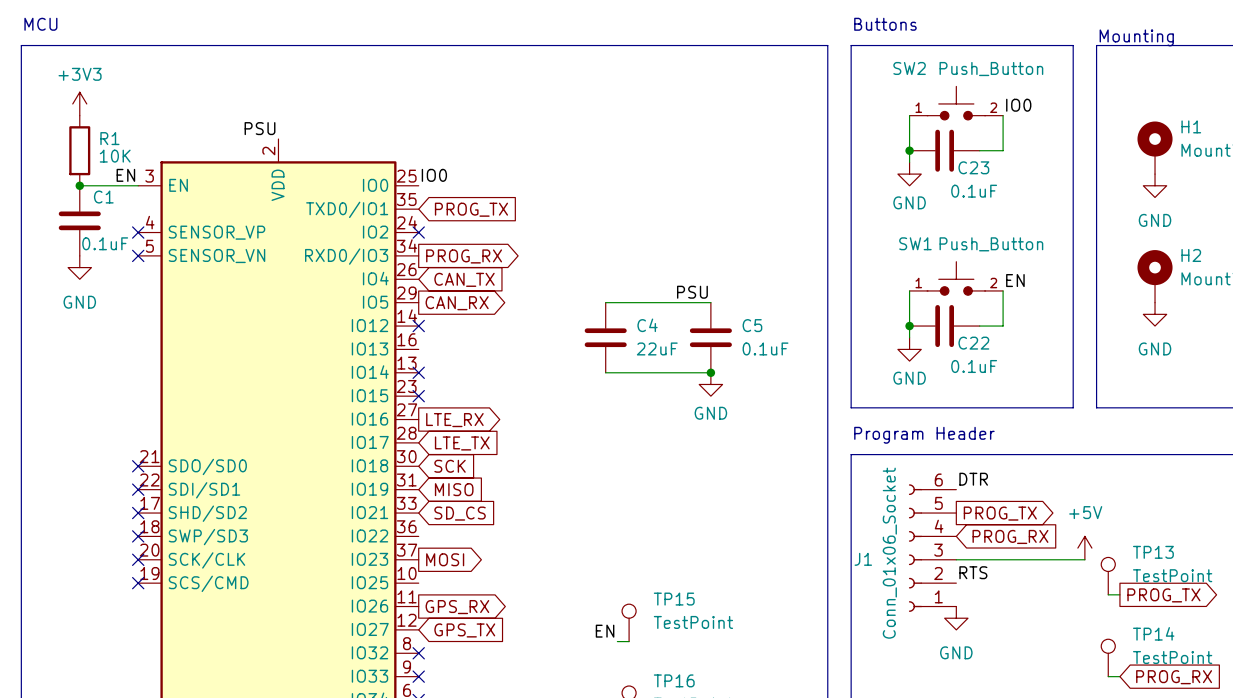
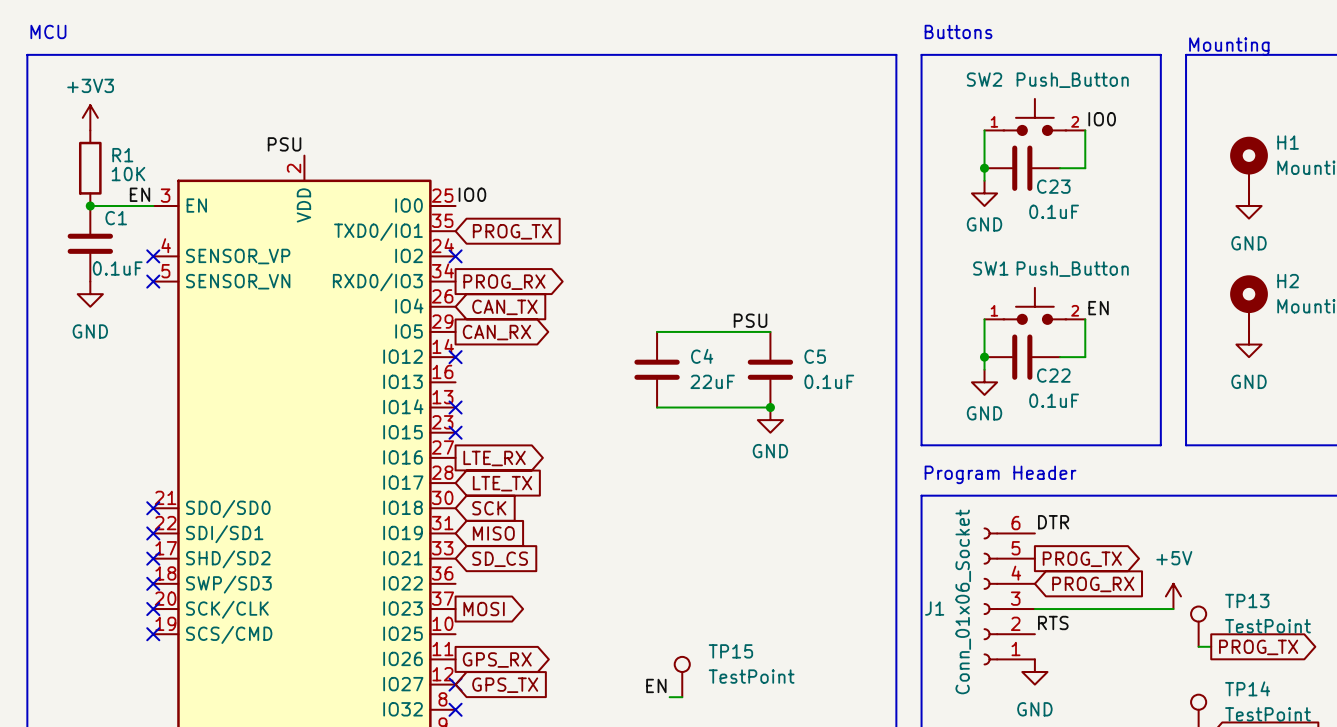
no-connect mark: none -> (455, 684)

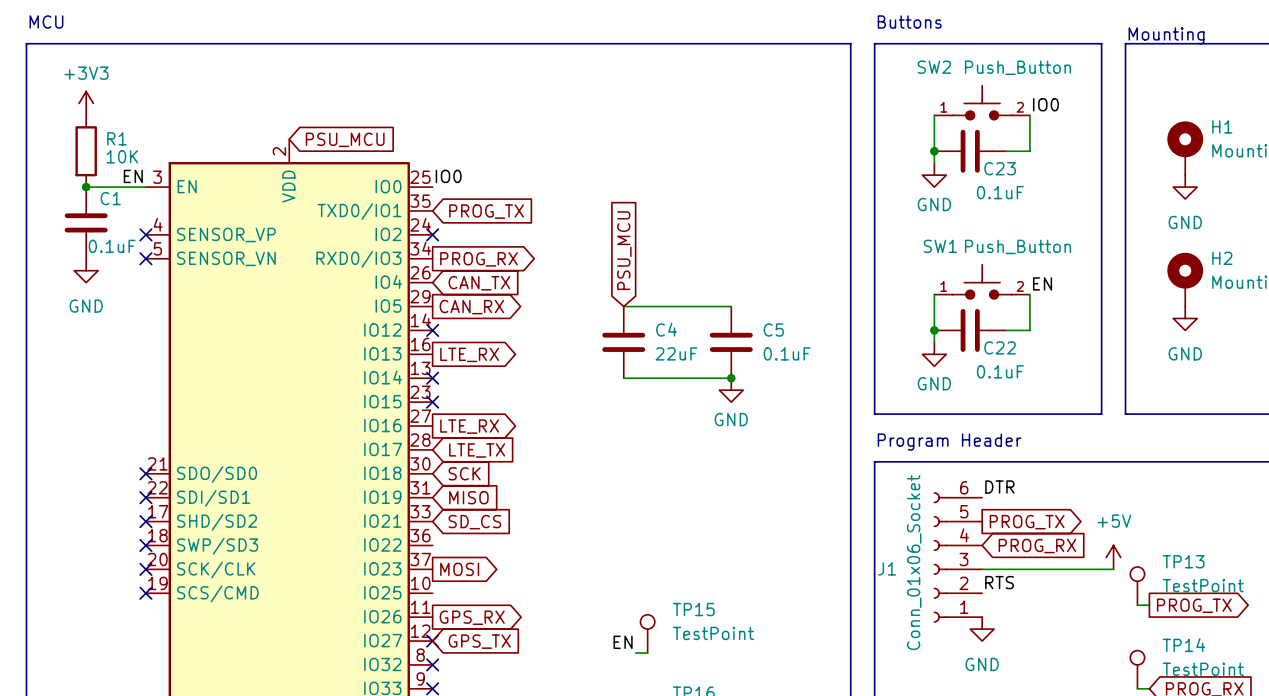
label: PSU (284, 144) -> none
global label: none -> PSU_MCU (345, 139)
global label: none -> PSU_MCU (624, 250)
label: PSU (750, 320) -> none
global label: none -> LTE_RX (469, 354)

